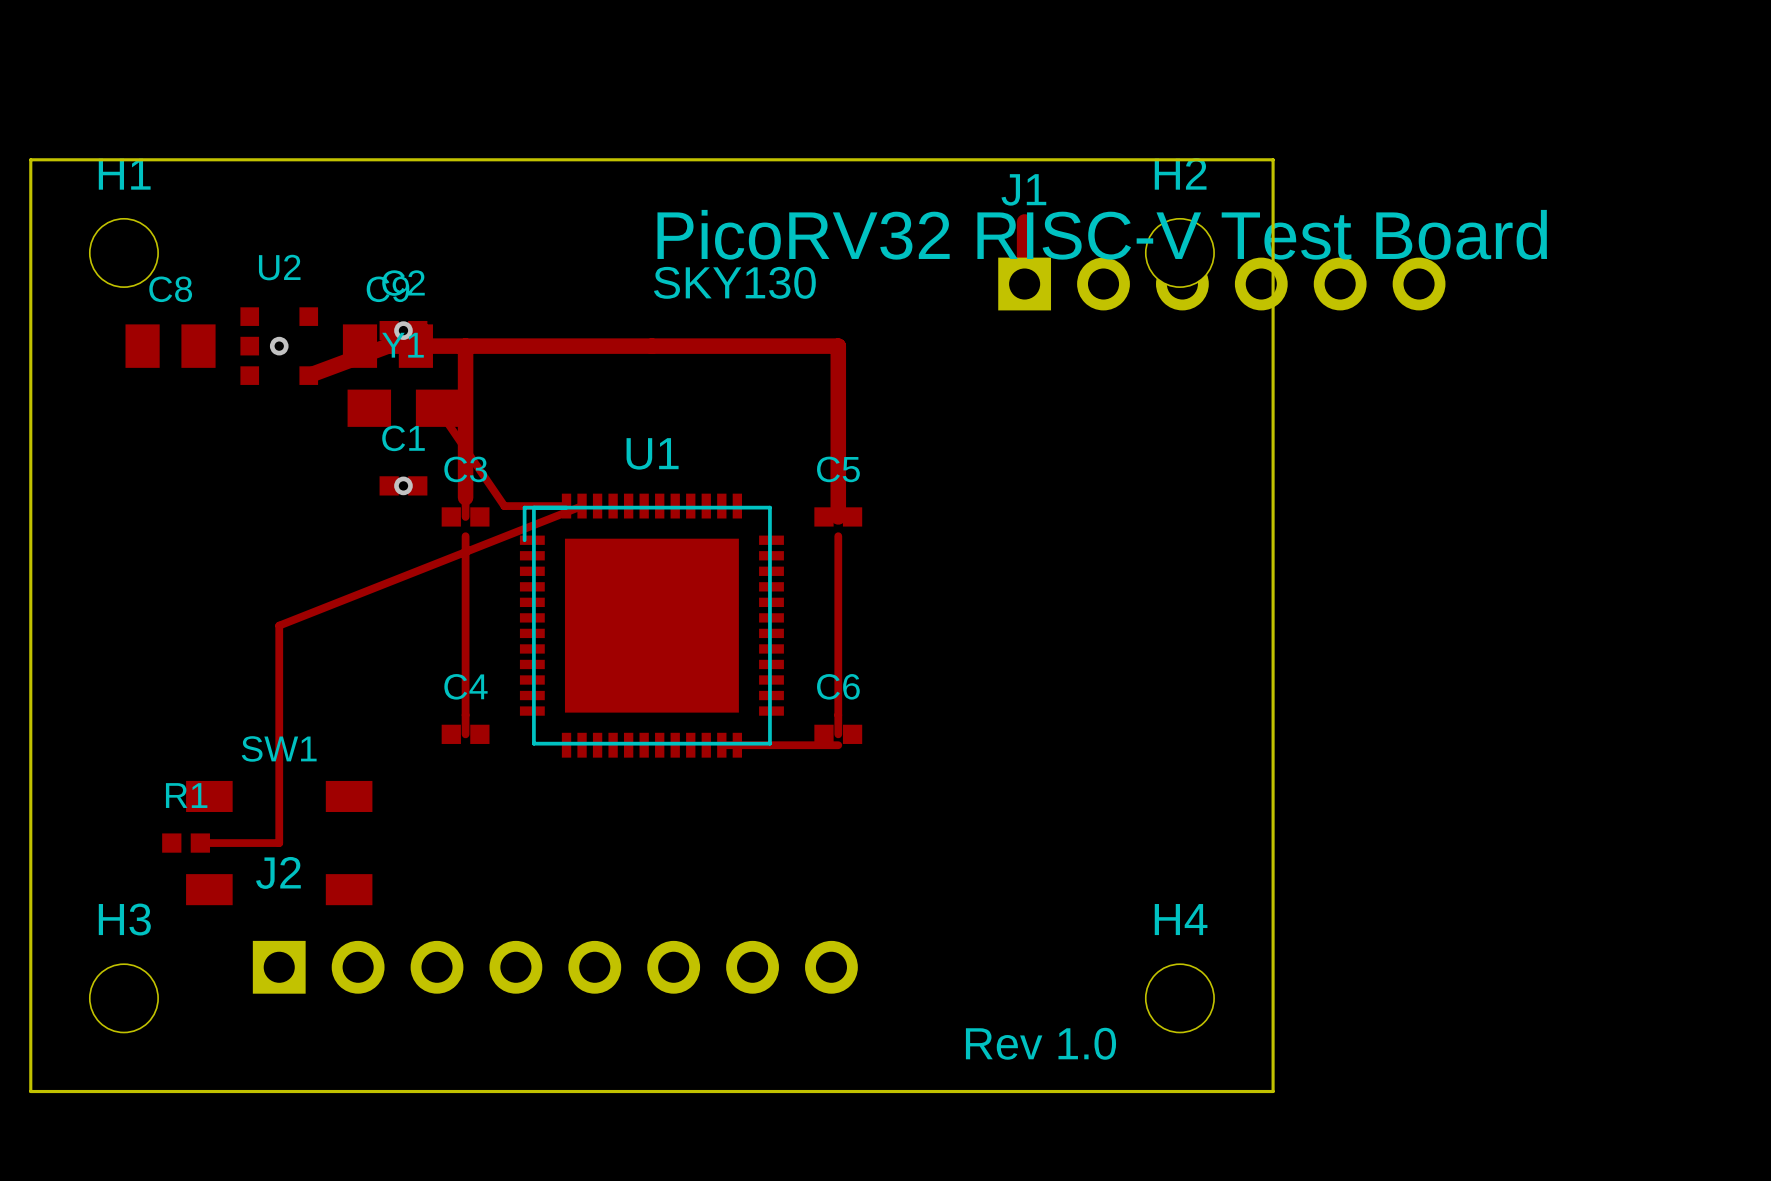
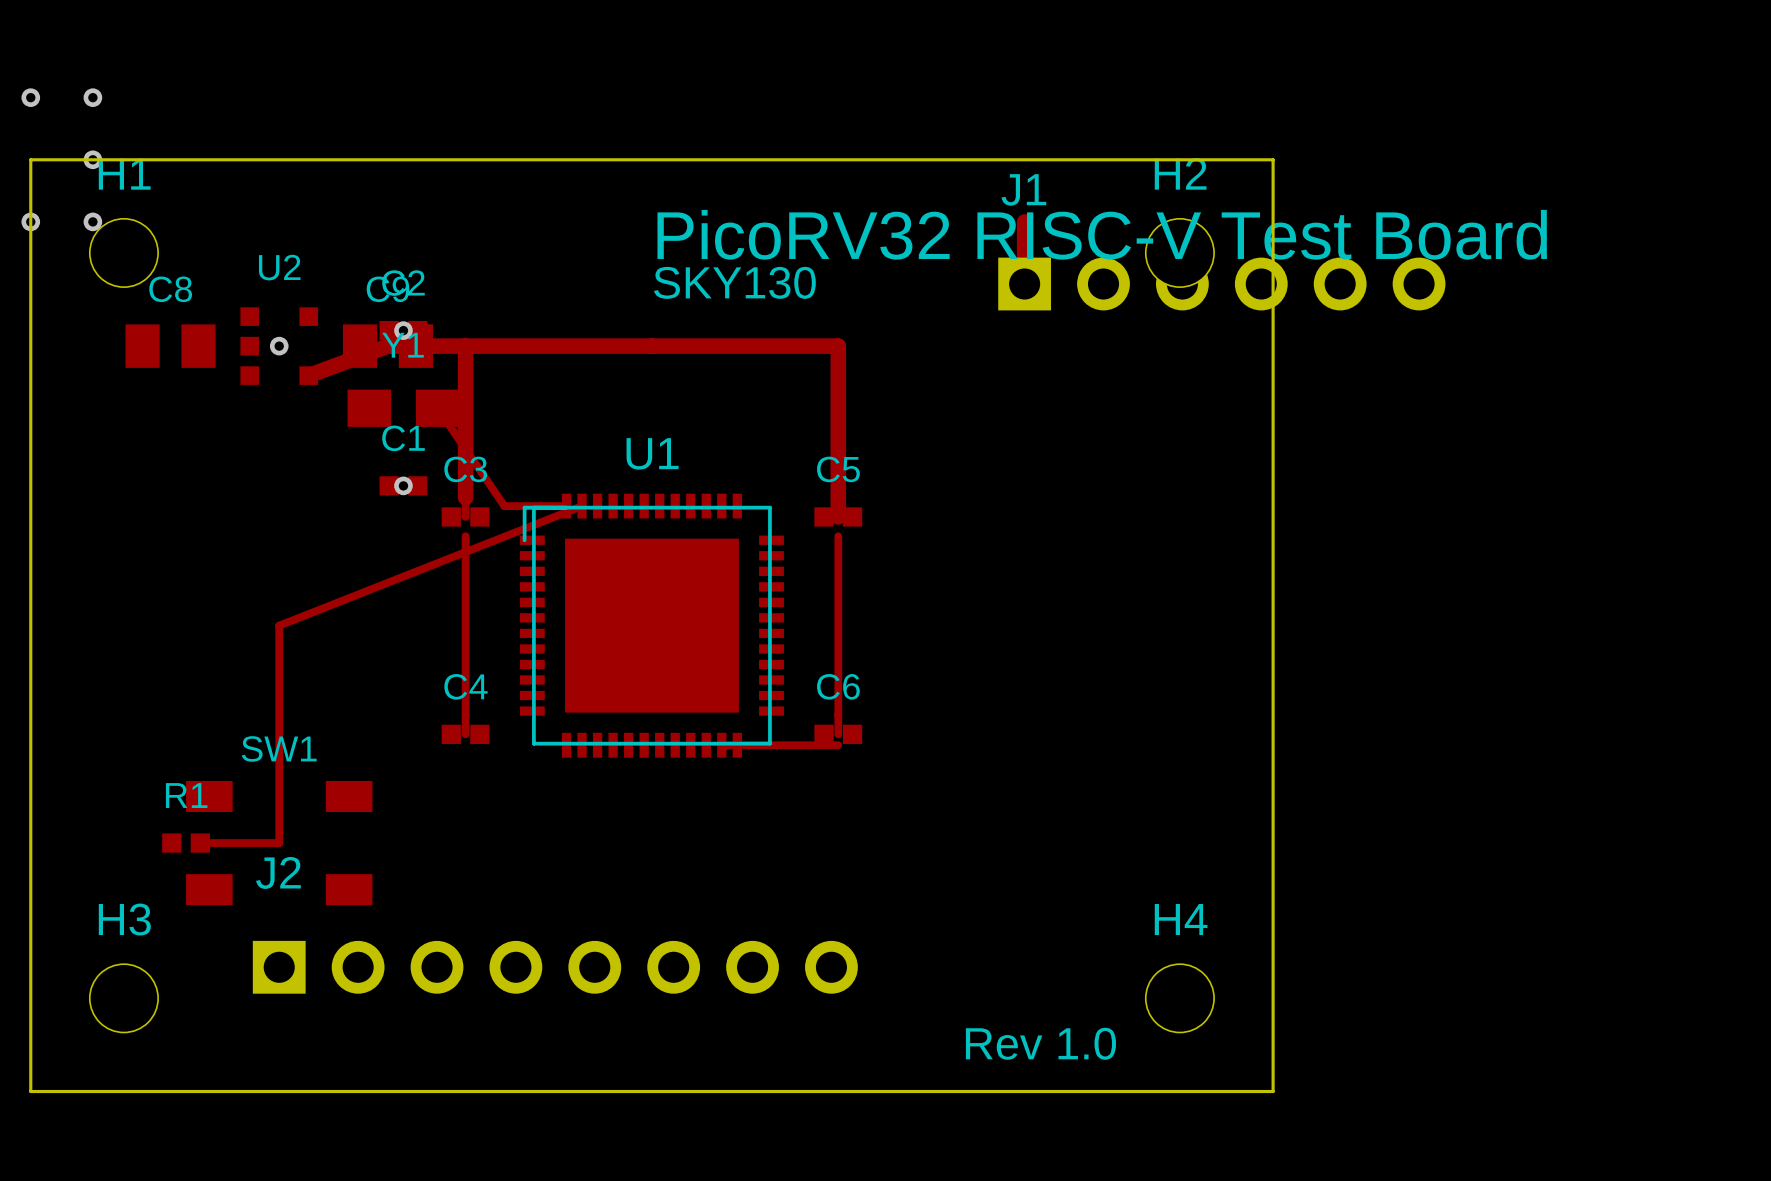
via: none -> (30, 97)
via: none -> (92, 97)
via: none -> (92, 159)
via: none -> (30, 221)
via: none -> (92, 221)

